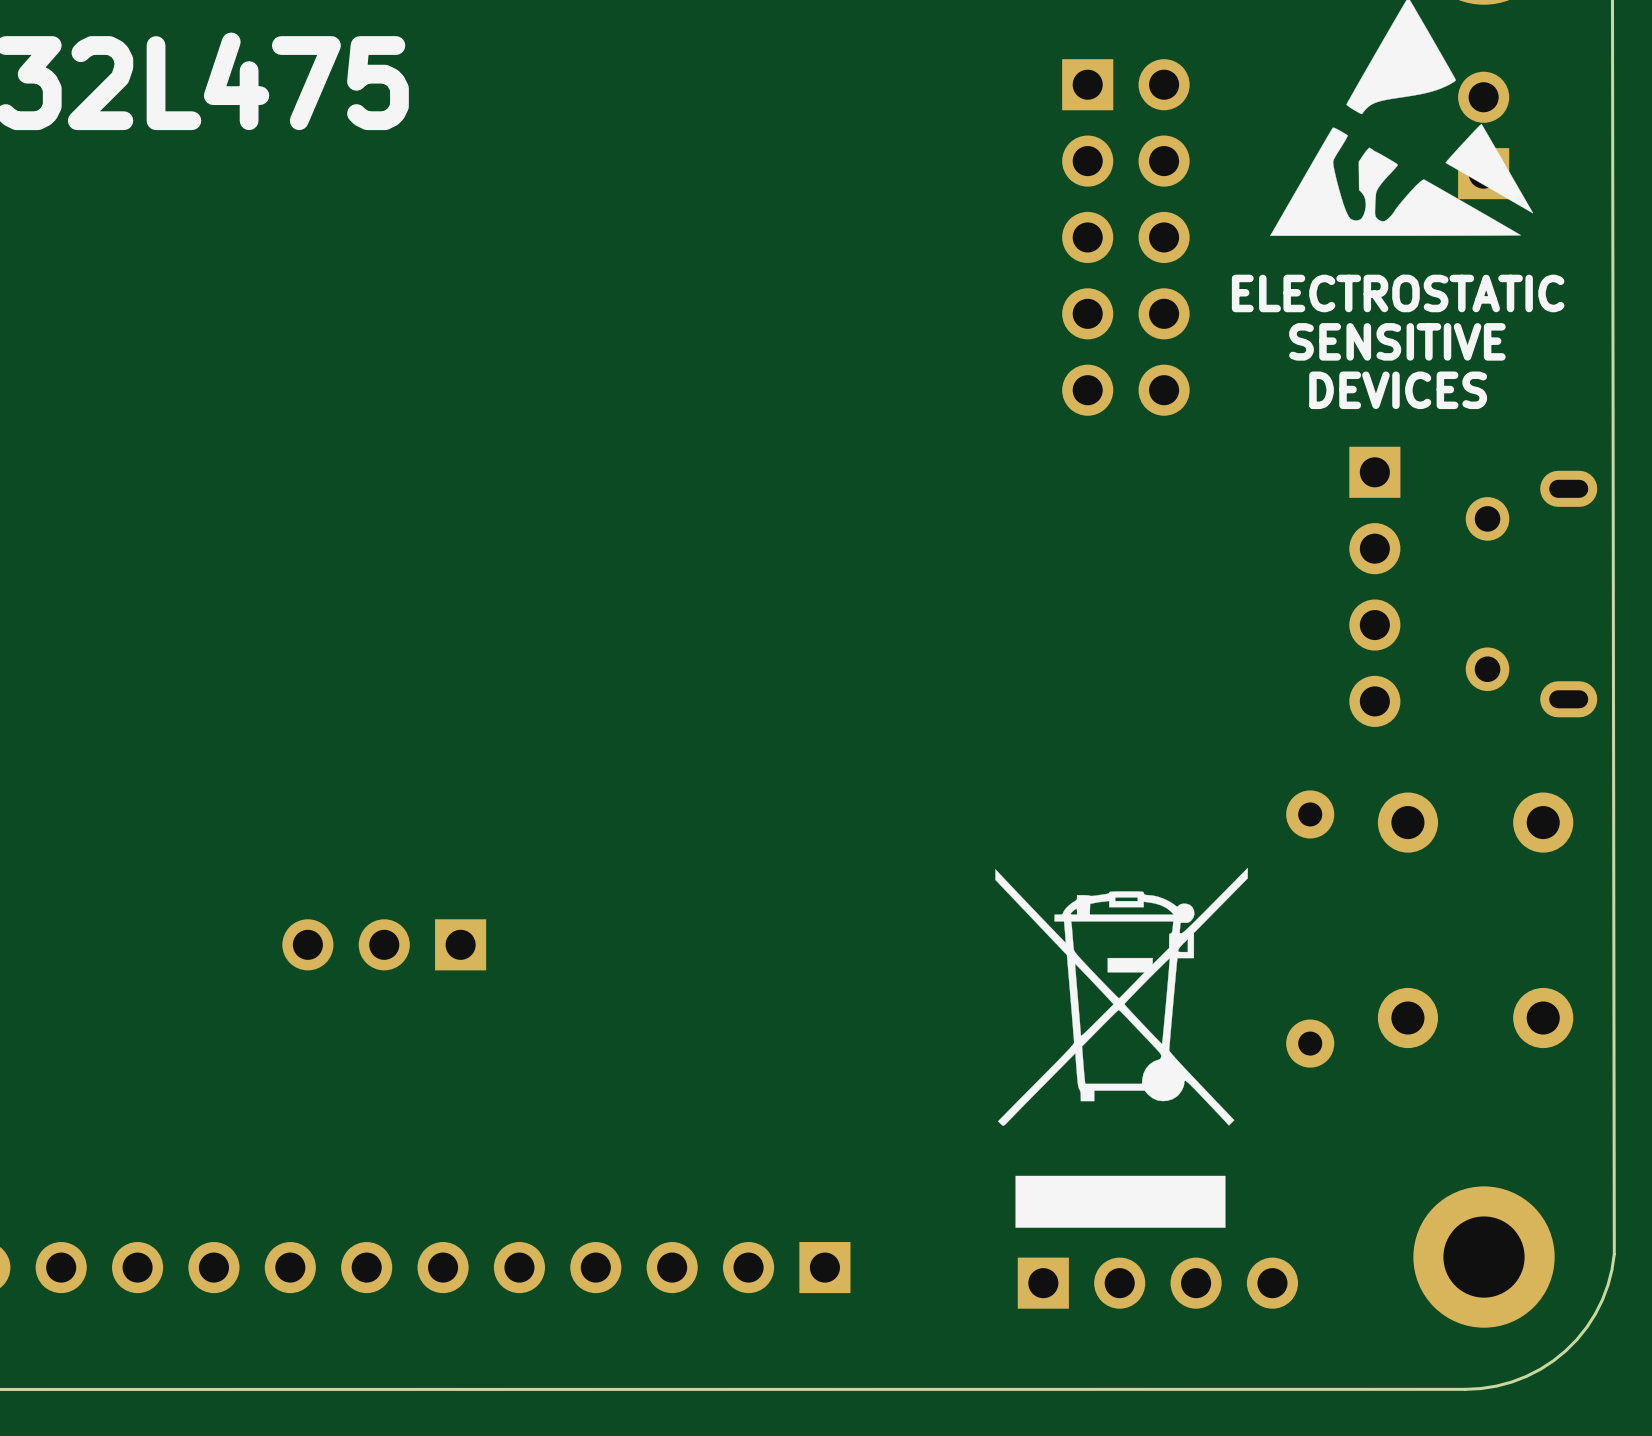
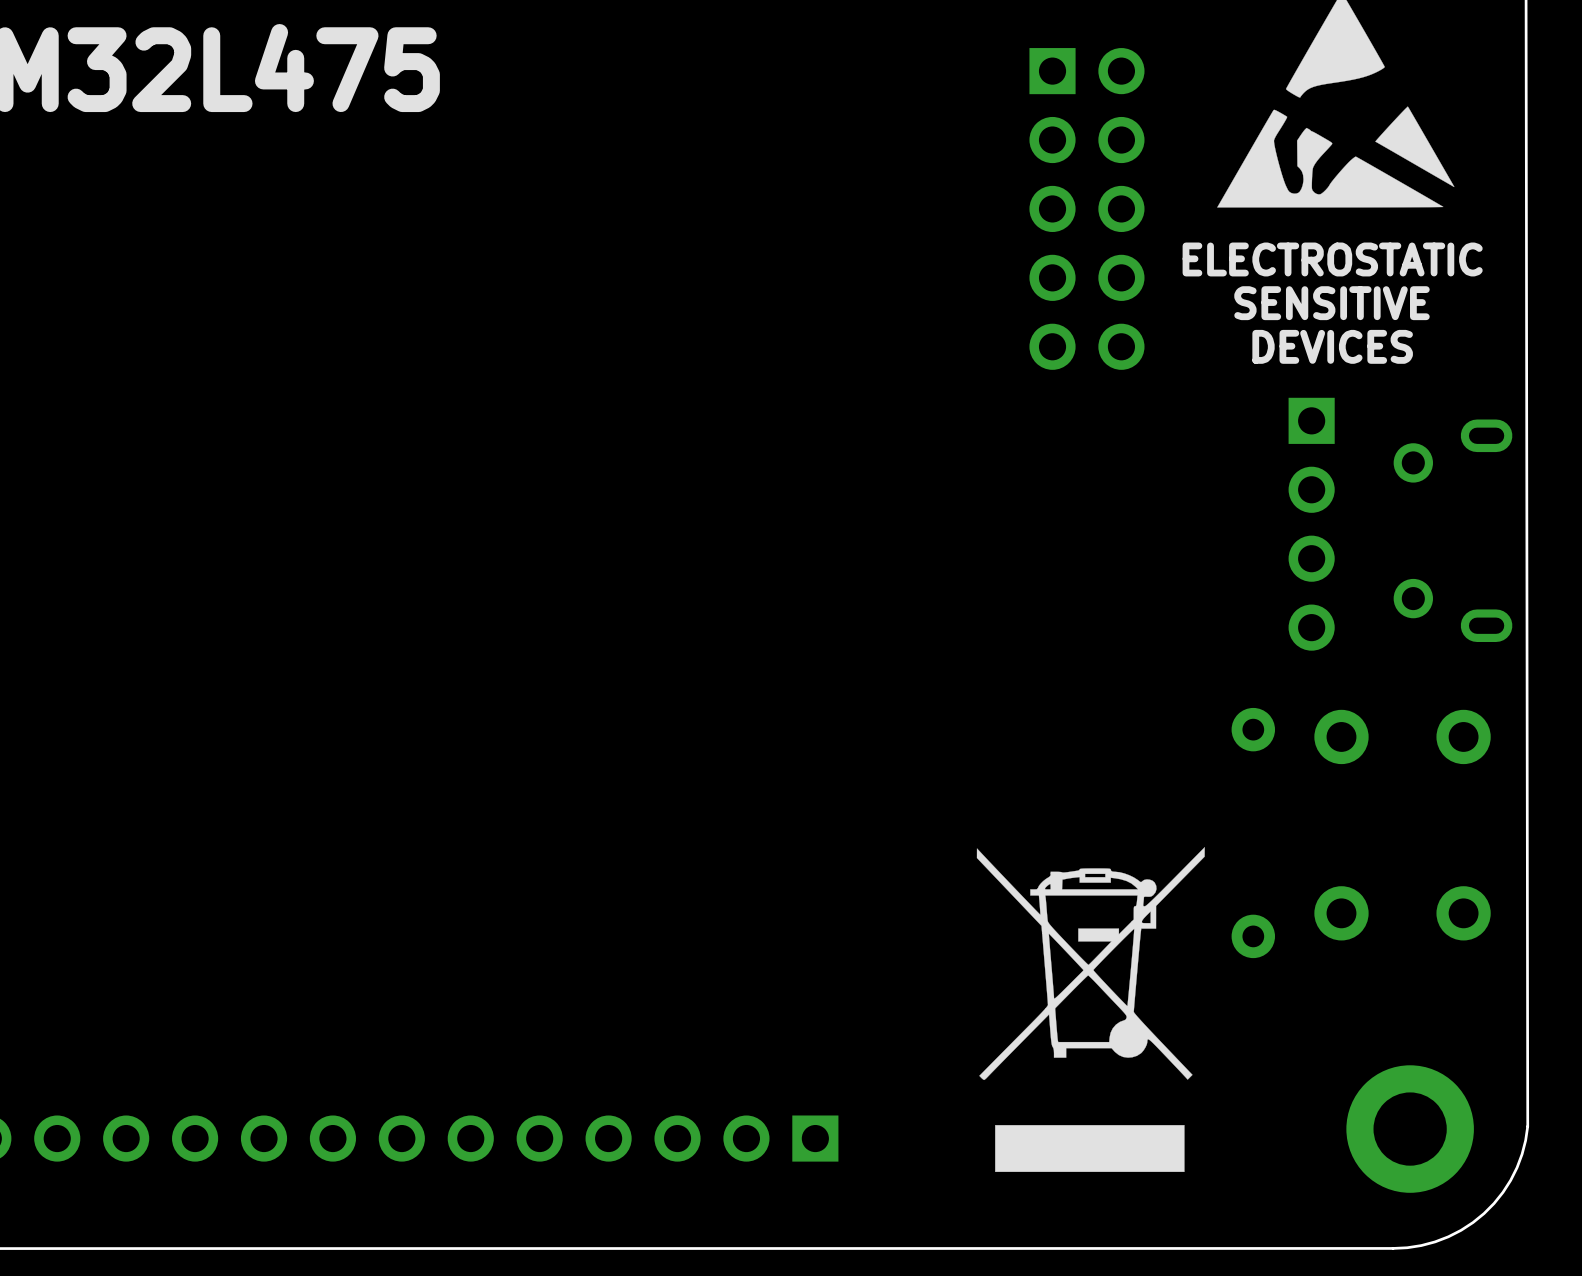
part: (1483, 135) -> none
part: (384, 944) -> none
drawing position: (1121, 1047) -> (1090, 1009)
part: (1157, 1283) -> none

